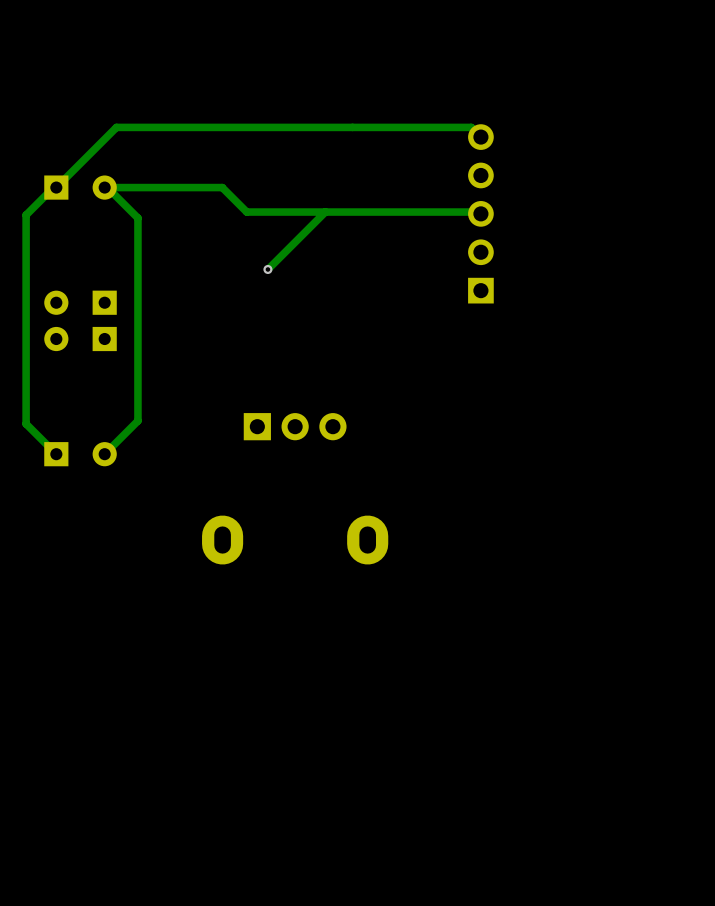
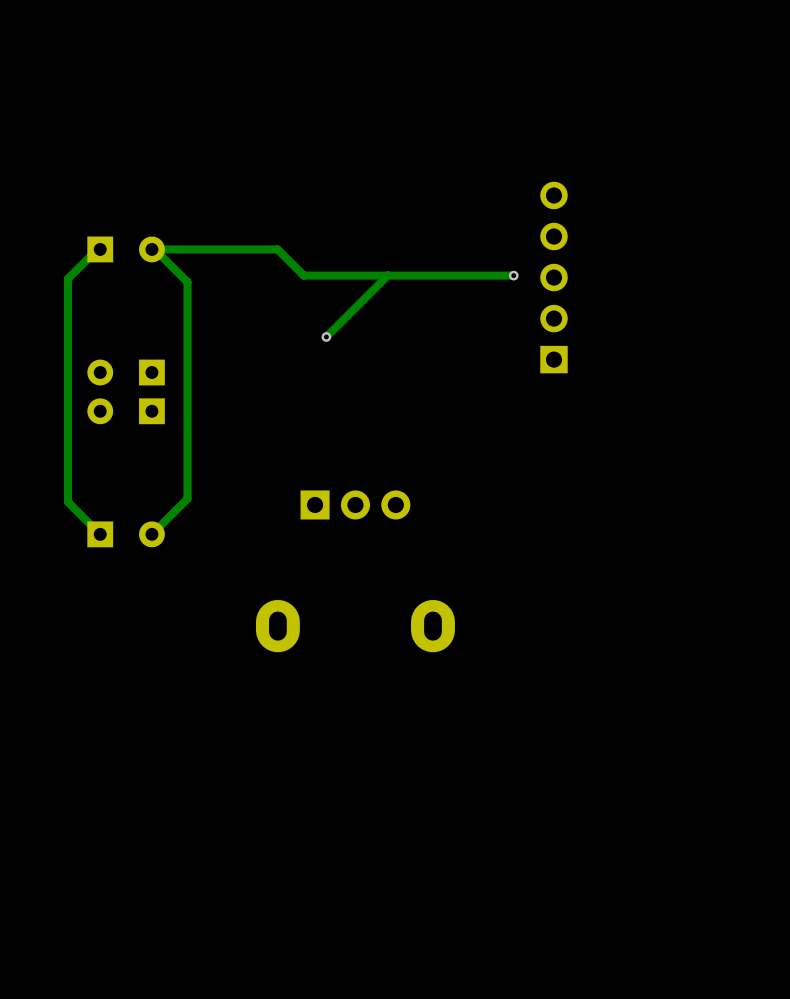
track: (480, 137) (471, 127) (116, 127) (56, 187) -> none
track: (443, 212) (479, 212) (480, 213) -> none
via: none -> (513, 275)

